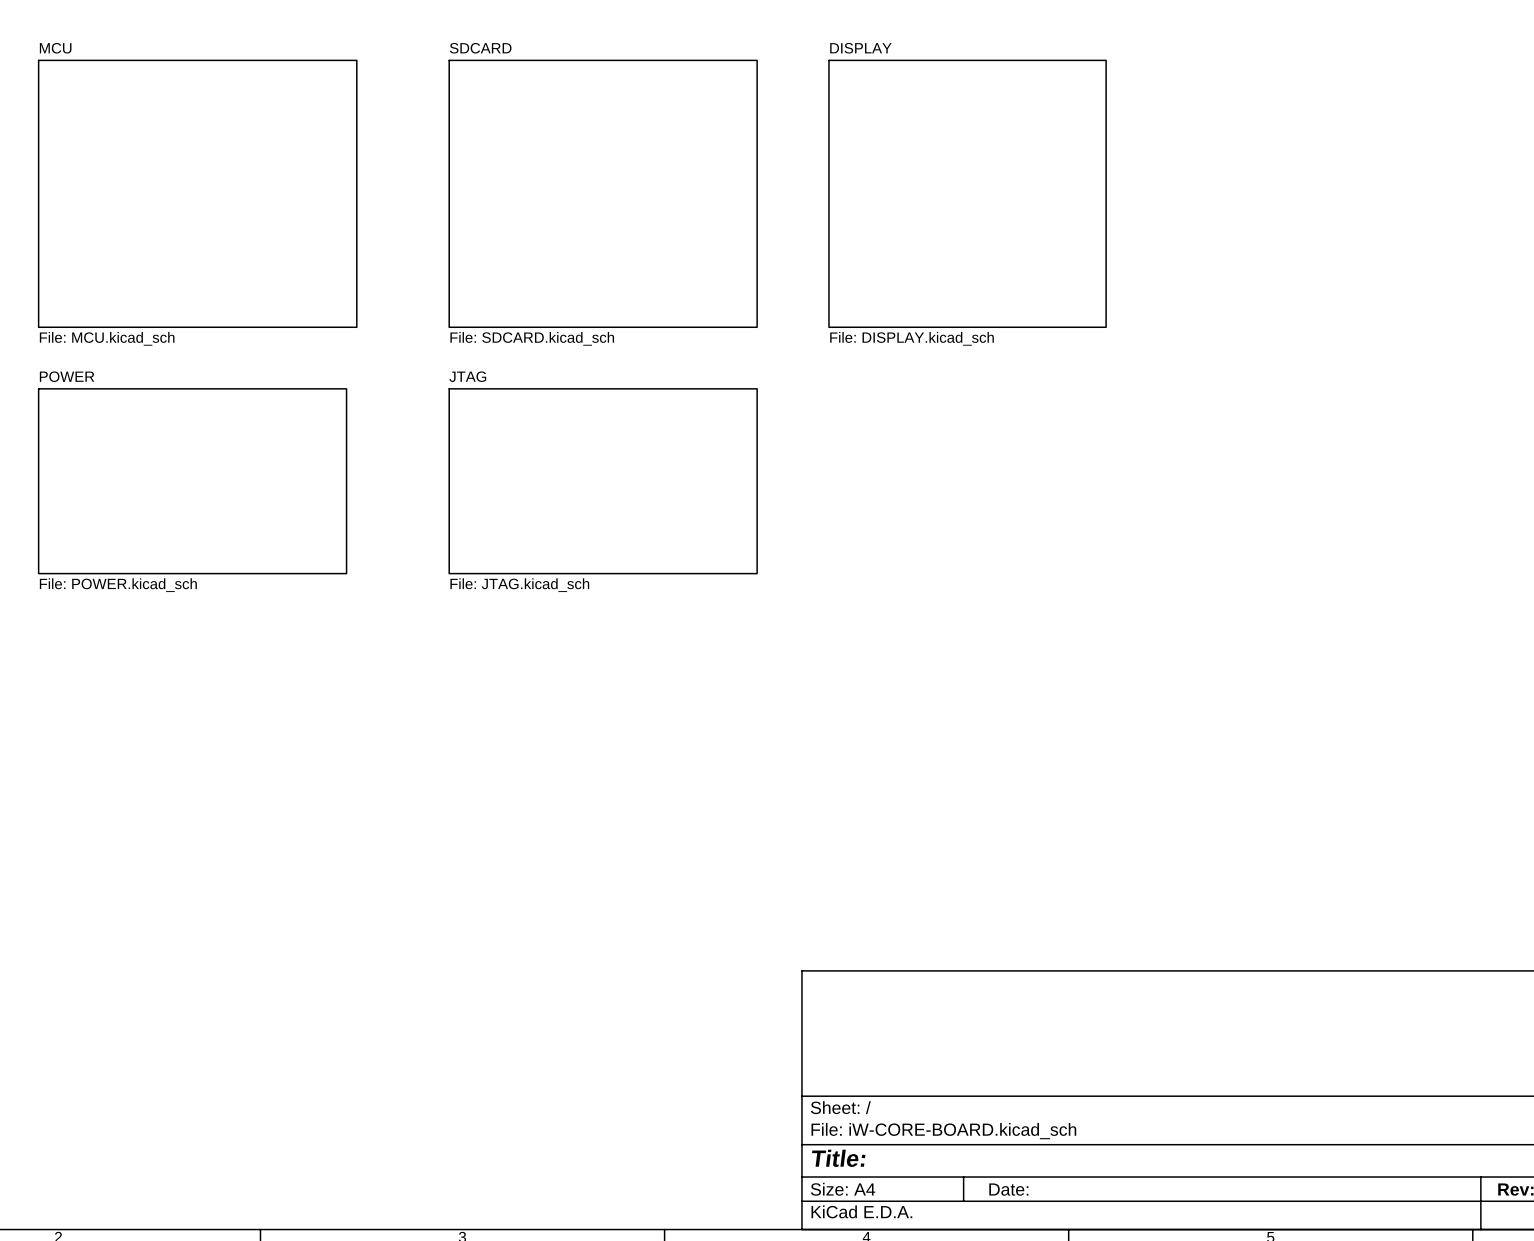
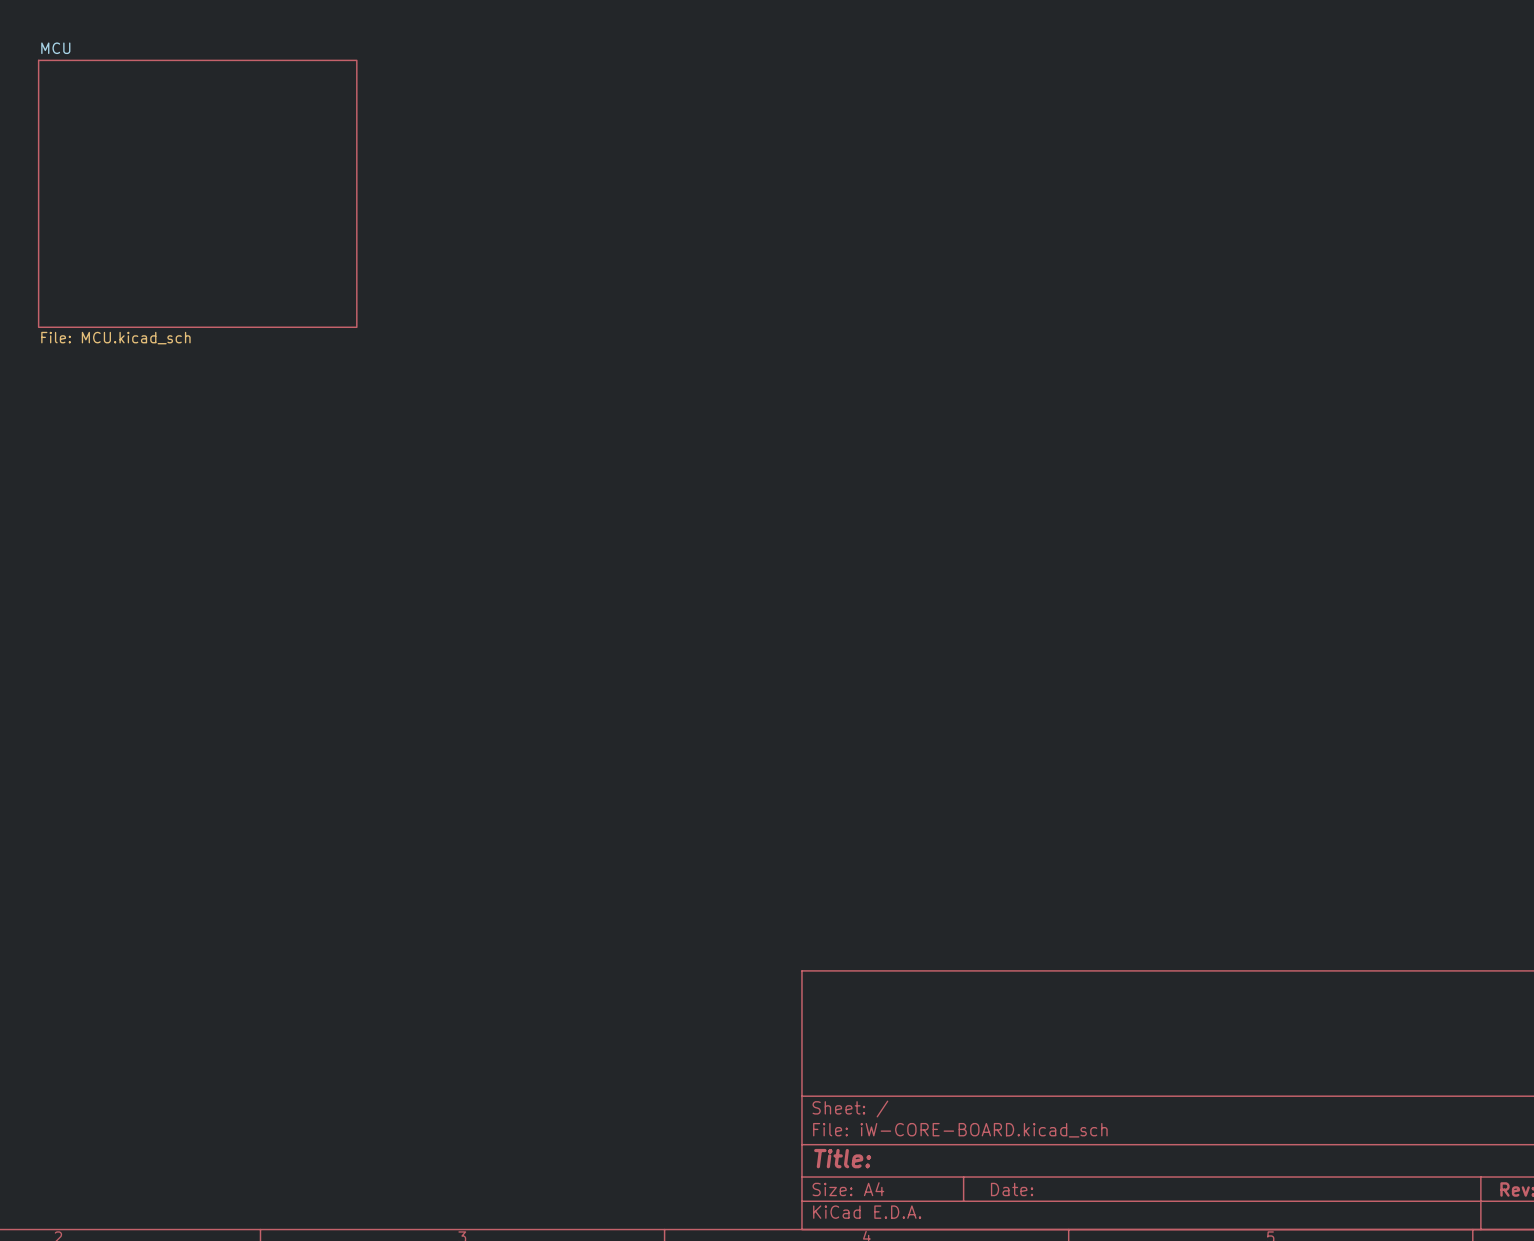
sheet SDCARD: File: SDCARD.kicad_sch (603, 193) -> none
sheet DISPLAY: File: DISPLAY.kicad_sch (967, 193) -> none
sheet POWER: File: POWER.kicad_sch (192, 481) -> none
sheet JTAG: File: JTAG.kicad_sch (603, 481) -> none

